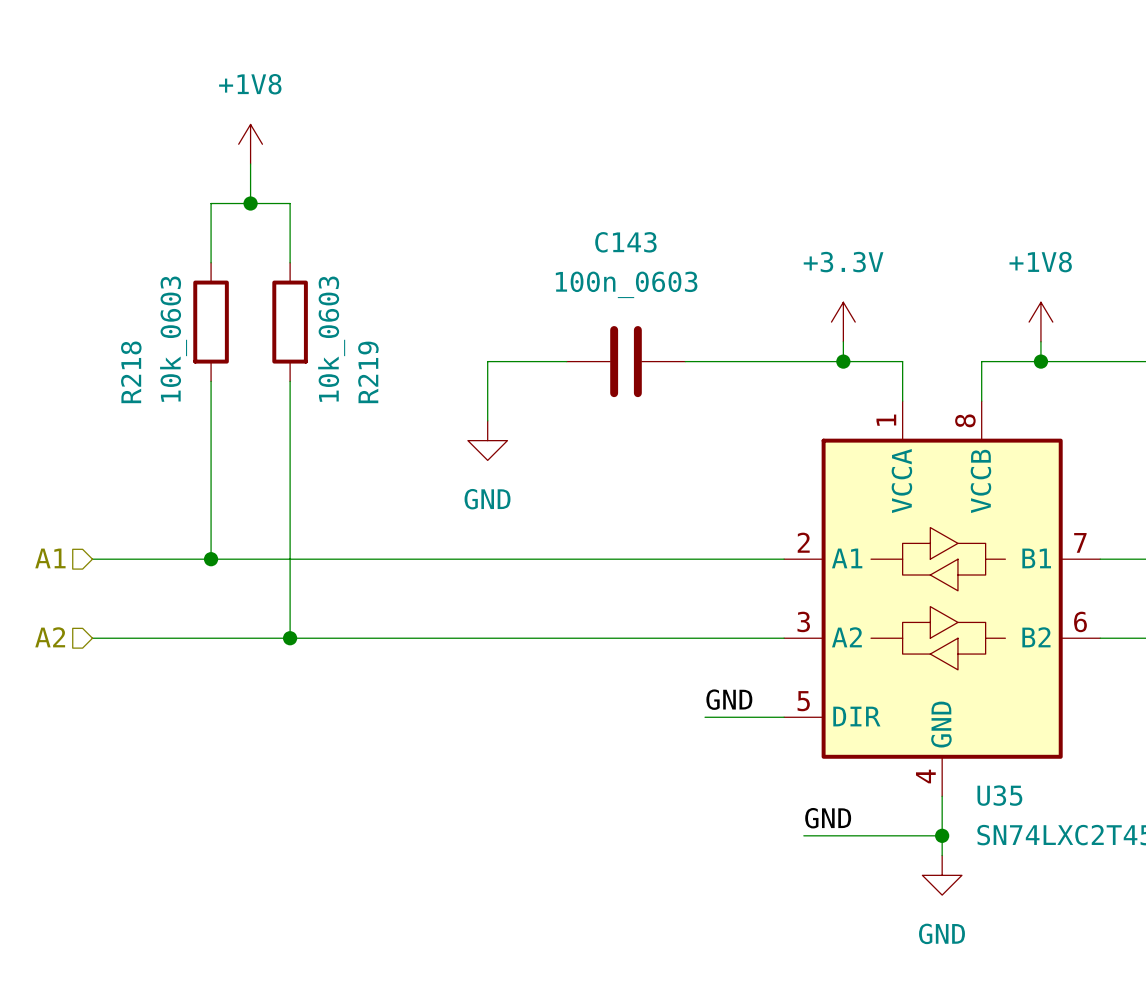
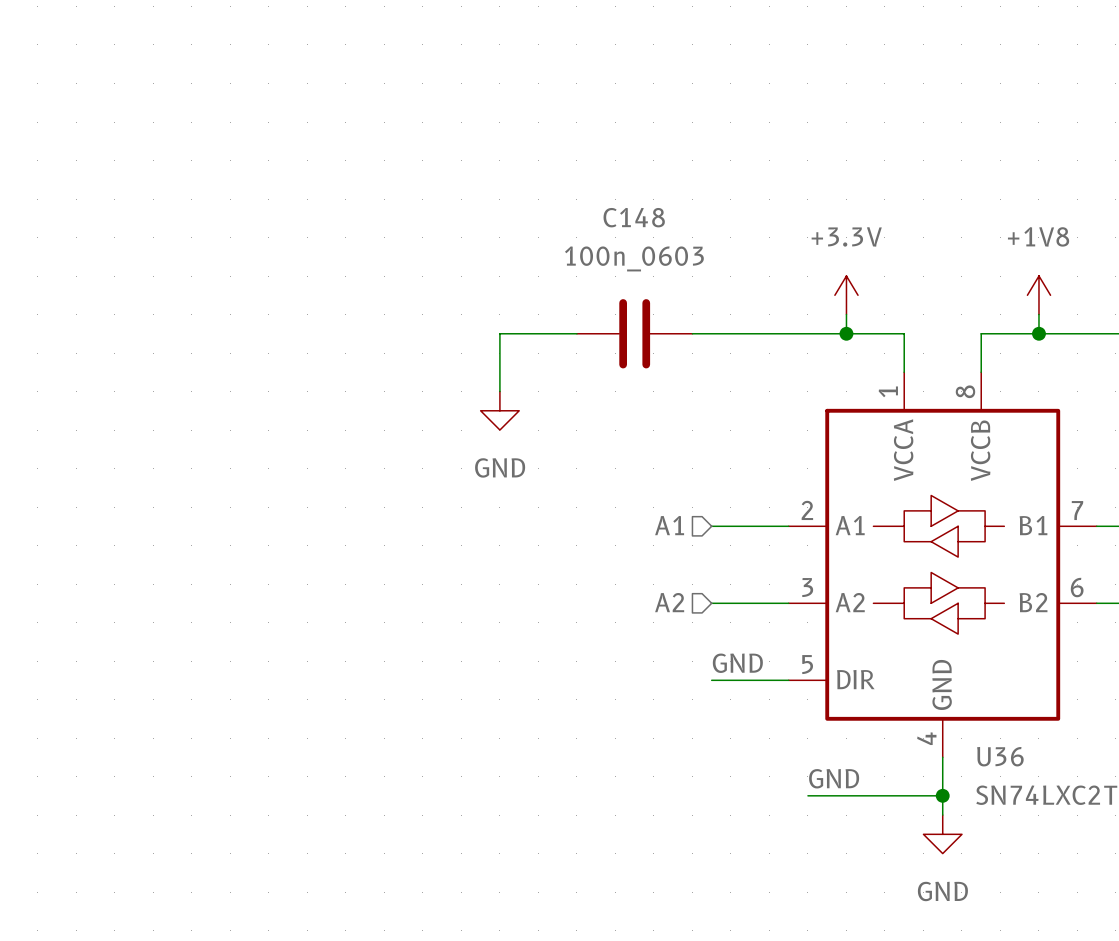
power symbol: +1V8 (250, 144) -> none
wire: (250, 164) (250, 203) -> none
junction: (250, 203) -> none
C143 name: C143 (625, 242) -> C148 (634, 217)
wire: (211, 262) (211, 203) (290, 203) (290, 262) -> none
R218: 10k_0603 (211, 322) -> none
R219: 10k_0603 (290, 322) -> none
wire: (211, 381) (211, 559) -> none
wire: (290, 381) (290, 638) -> none
hierarchical label: A1 (50, 558) -> none
hierarchical label: none -> A1 (669, 525)
wire: (92, 559) (705, 559) -> none
junction: (211, 559) -> none
hierarchical label: A2 (50, 637) -> none
hierarchical label: none -> A2 (669, 602)
wire: (92, 638) (705, 638) -> none
junction: (290, 638) -> none
U35 name: U35 (999, 795) -> U36 (1000, 756)

